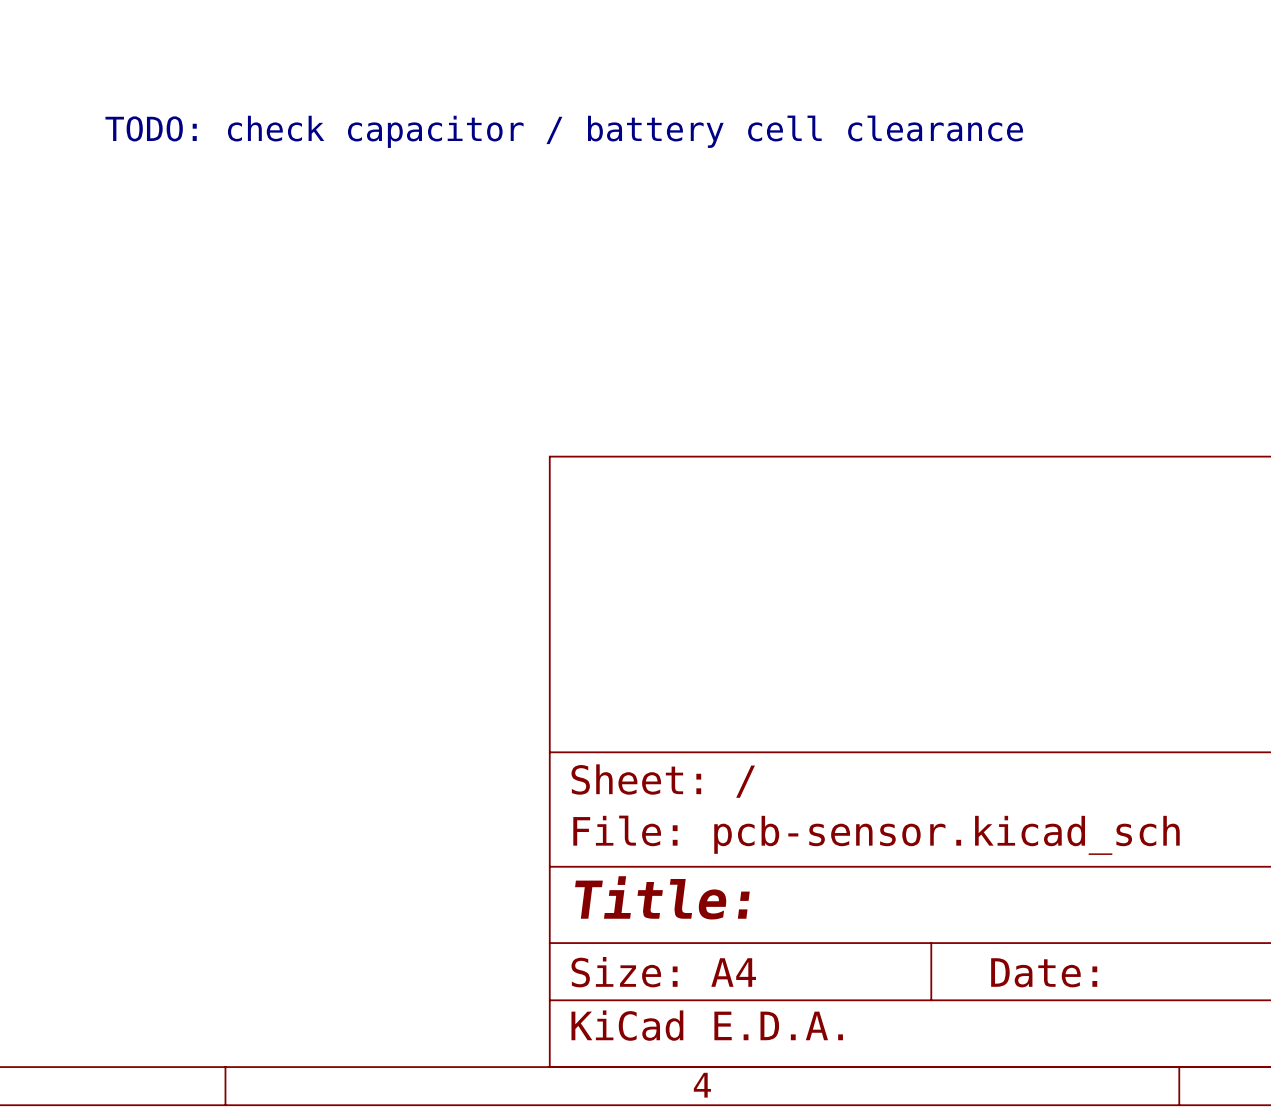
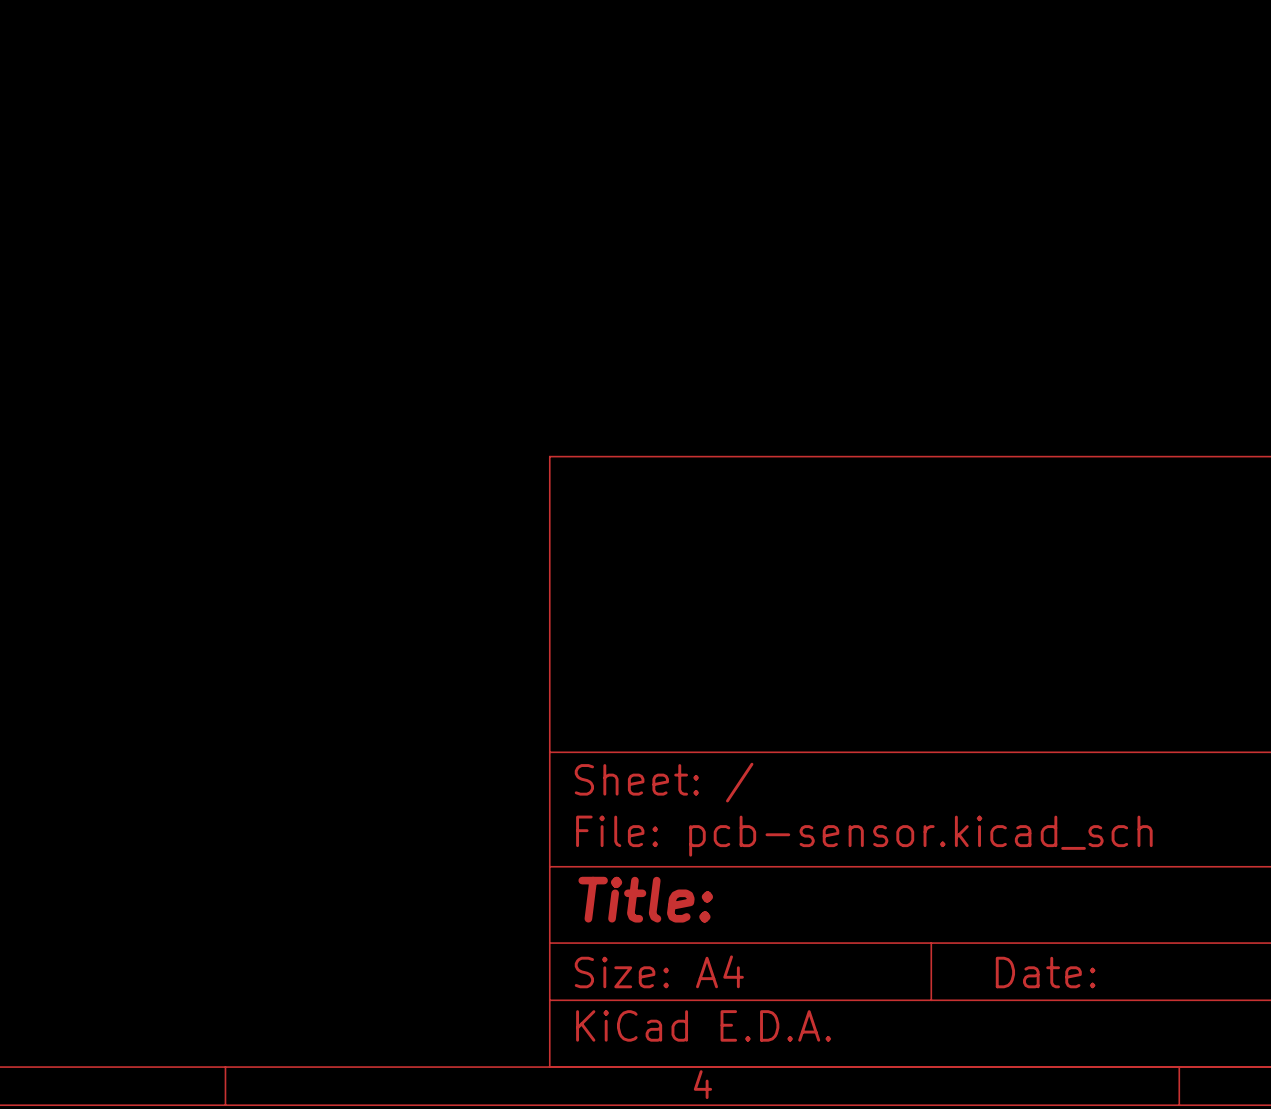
text: TODO: check capacitor / battery cell clearance (564, 131) -> none

